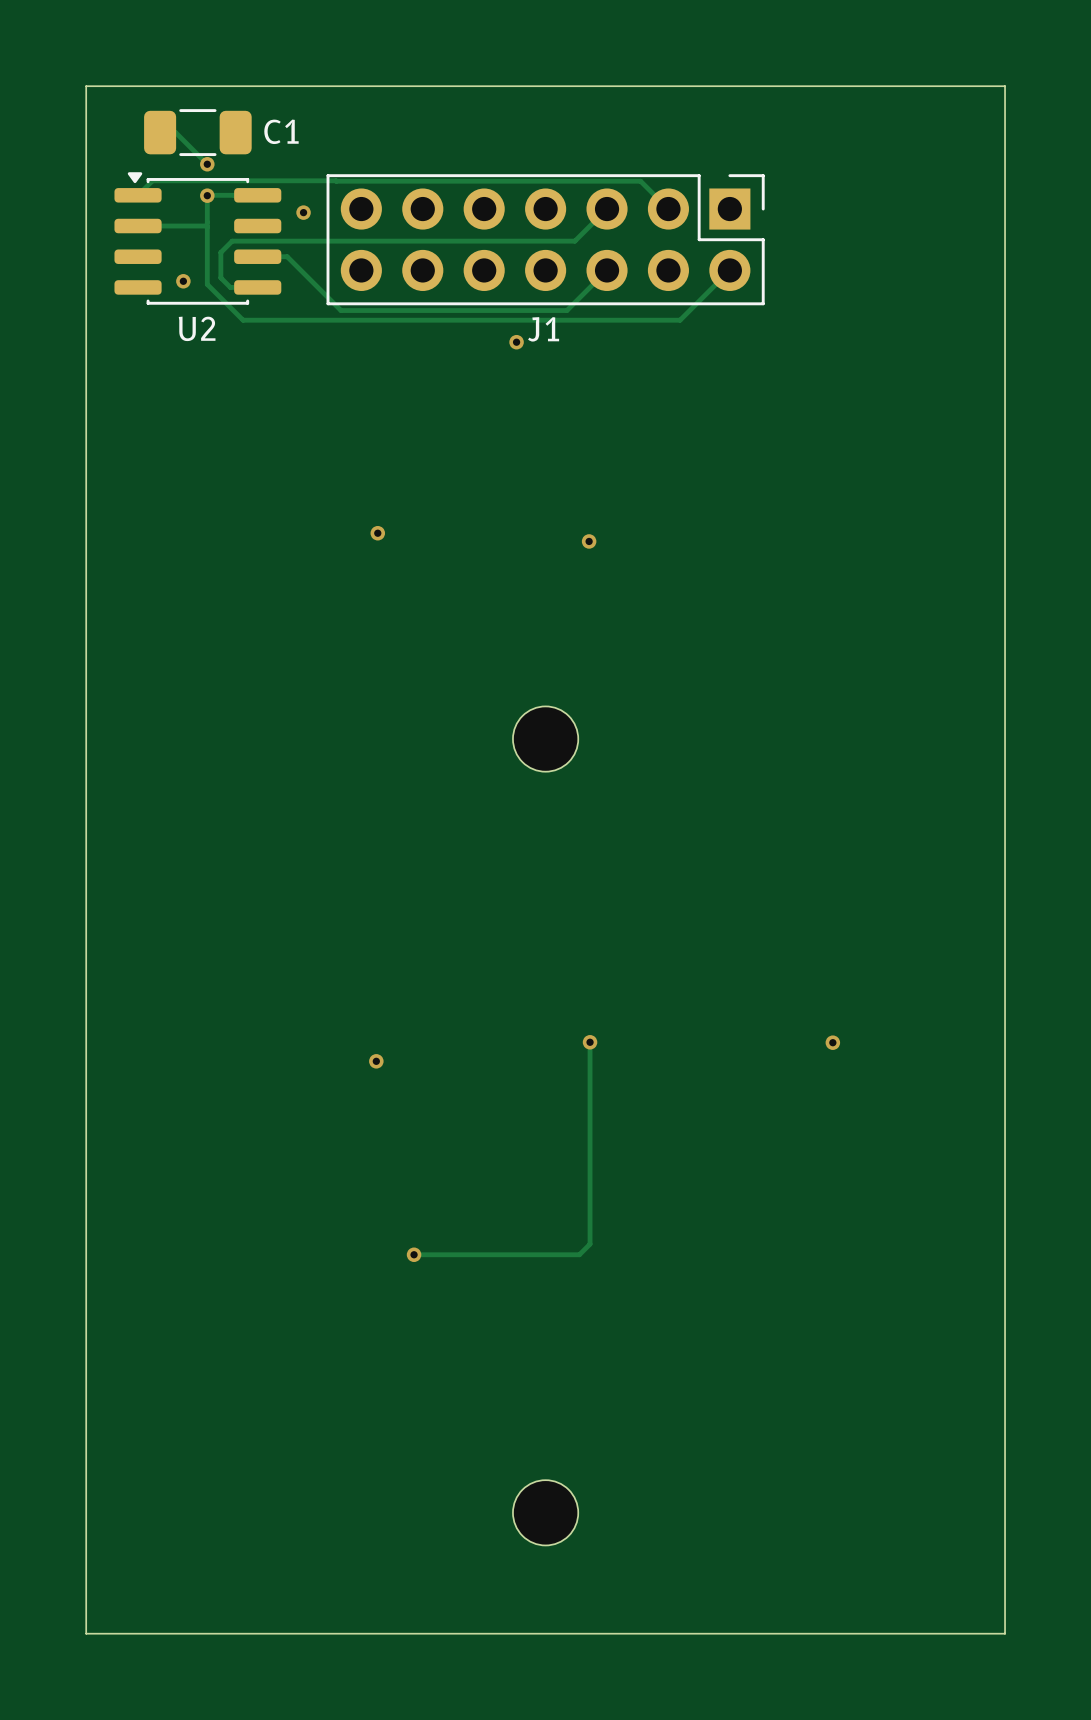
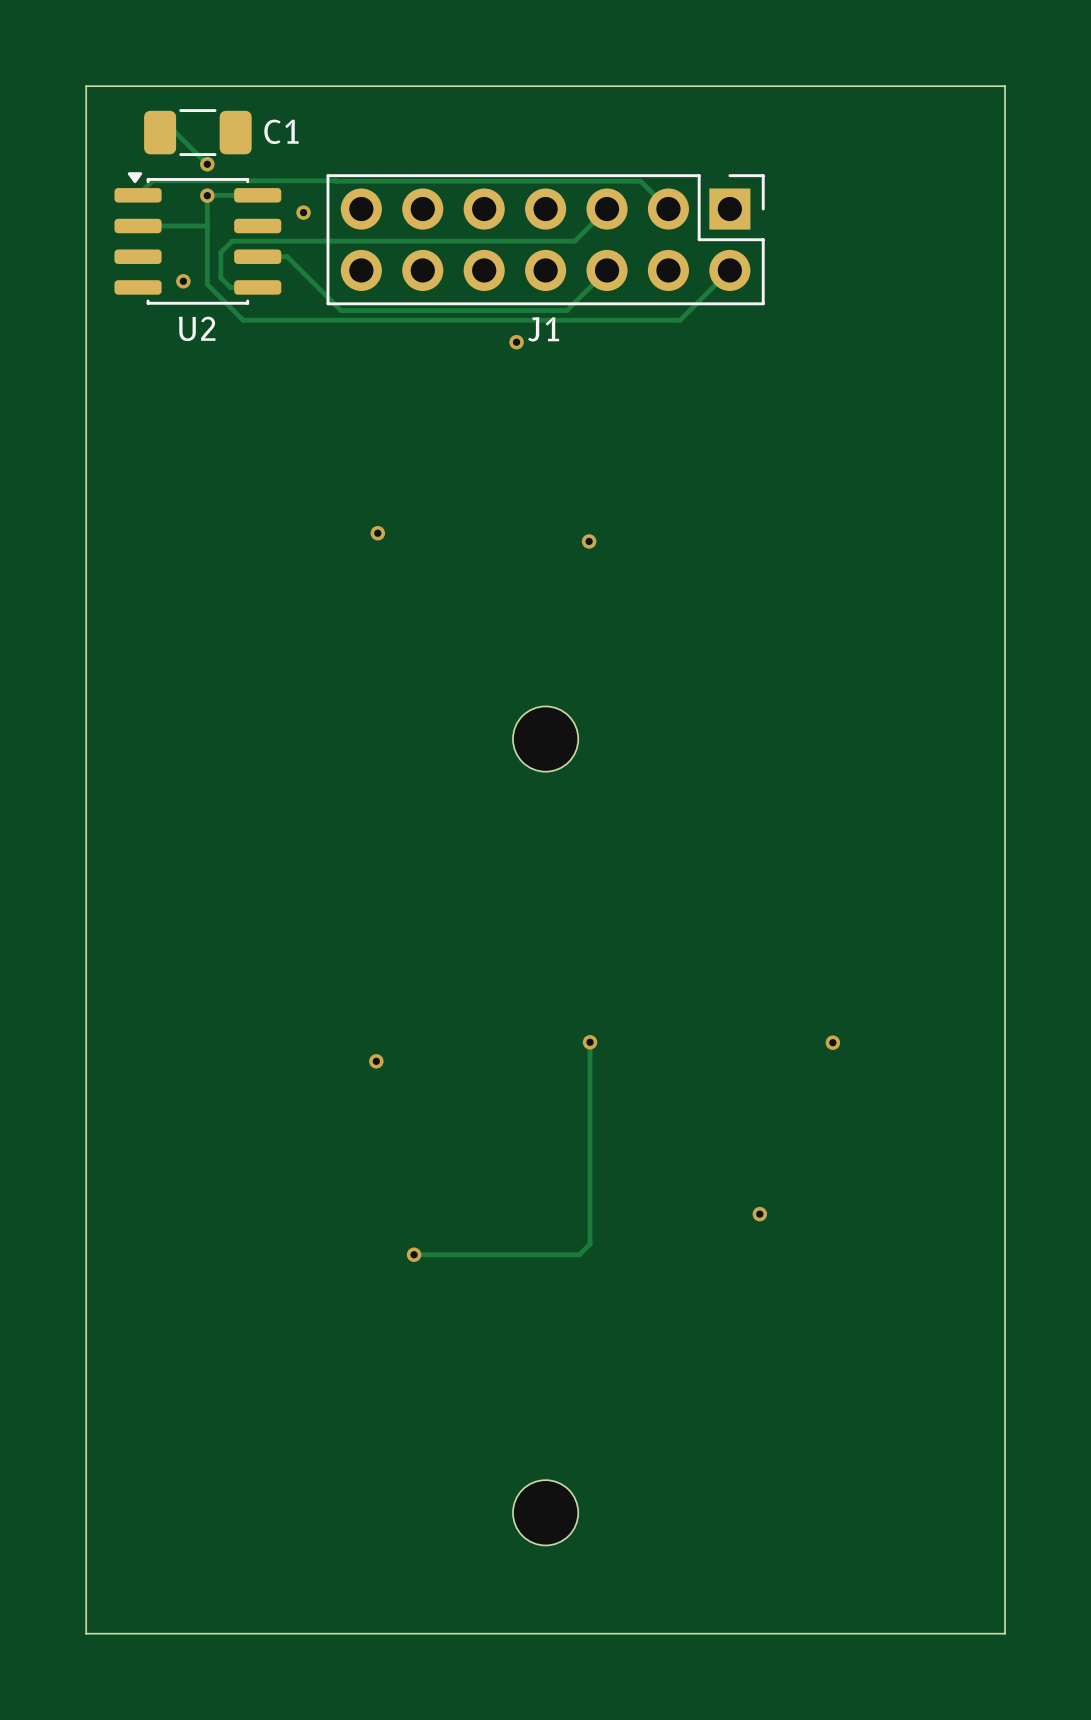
via: none -> (759, 1214)

